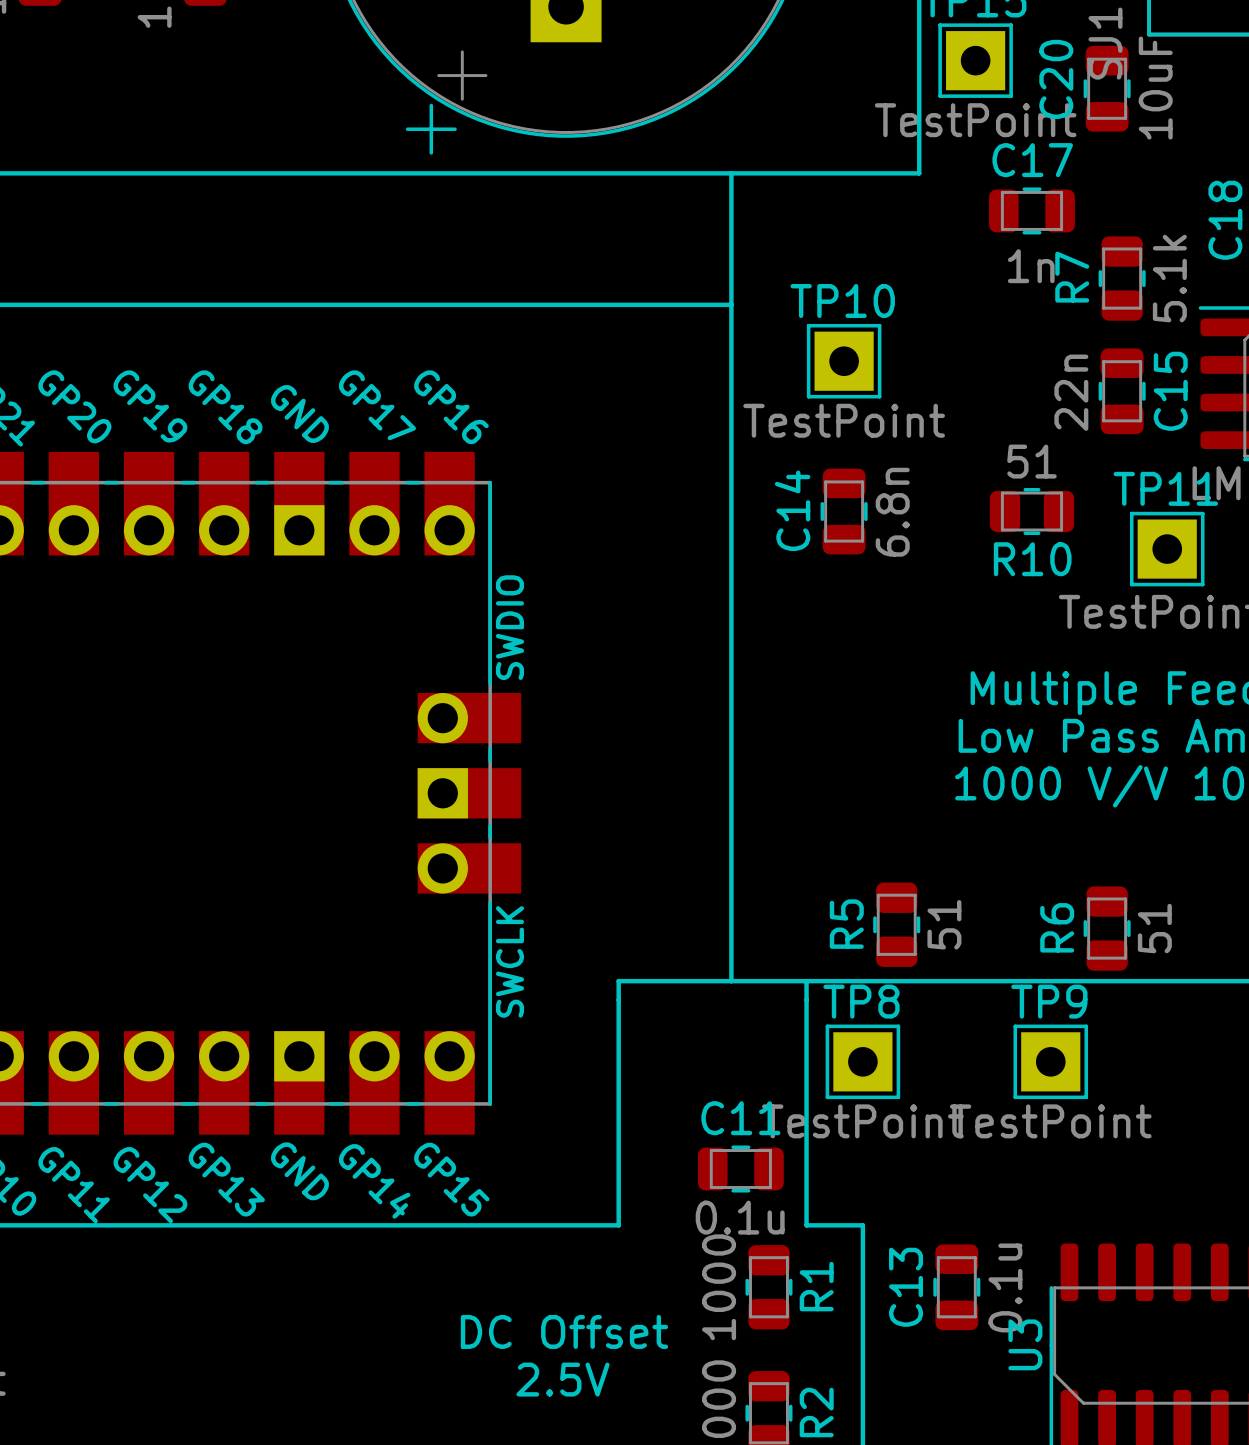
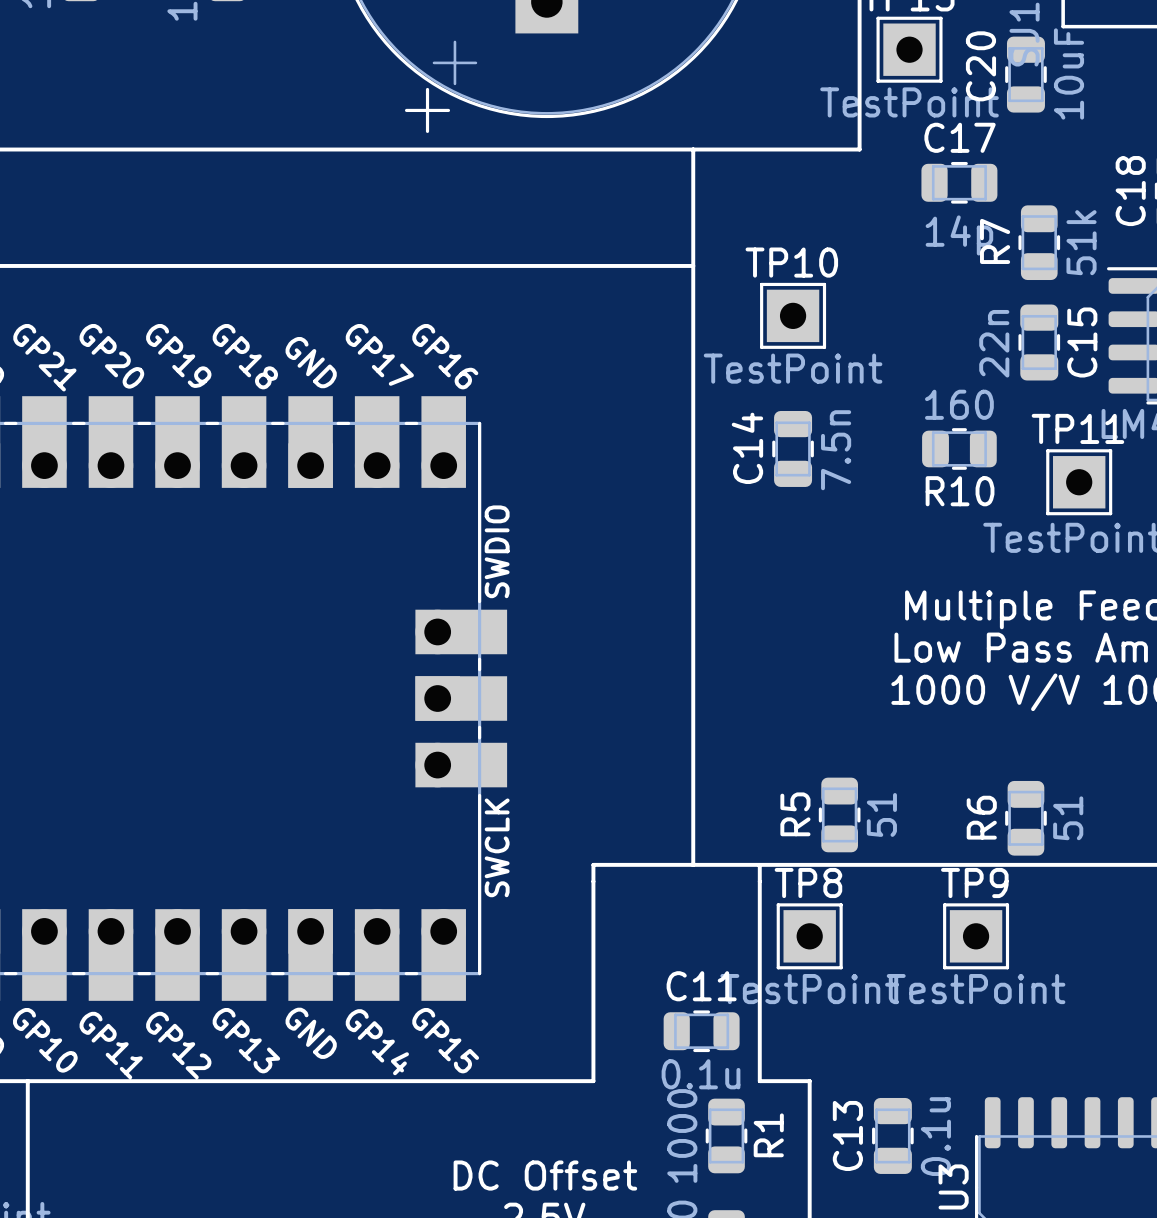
C17 value: 1n (1031, 266) -> 14p (959, 235)
R7 value: 5.1k (1169, 278) -> 51k (1081, 242)
R10 value: 51 (1031, 461) -> 160 (959, 404)
C14 value: 6.8n (892, 512) -> 7.5n (836, 450)

